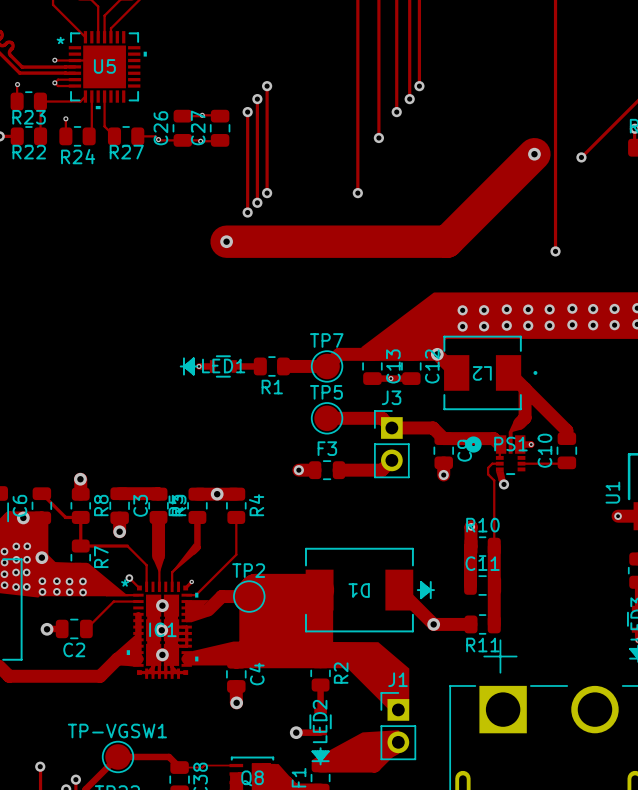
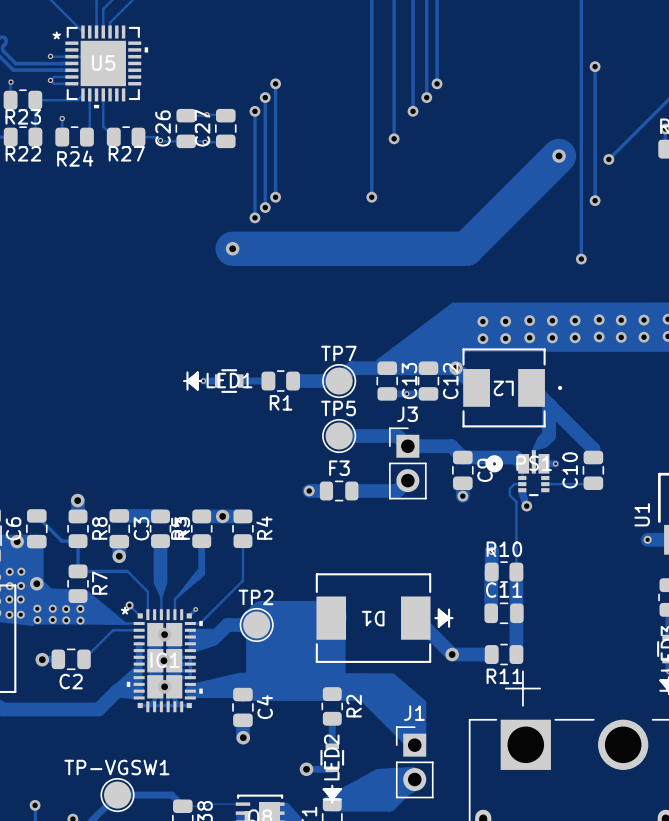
track: none -> (595, 66) (595, 200)
via: none -> (595, 66)
via: none -> (595, 200)

